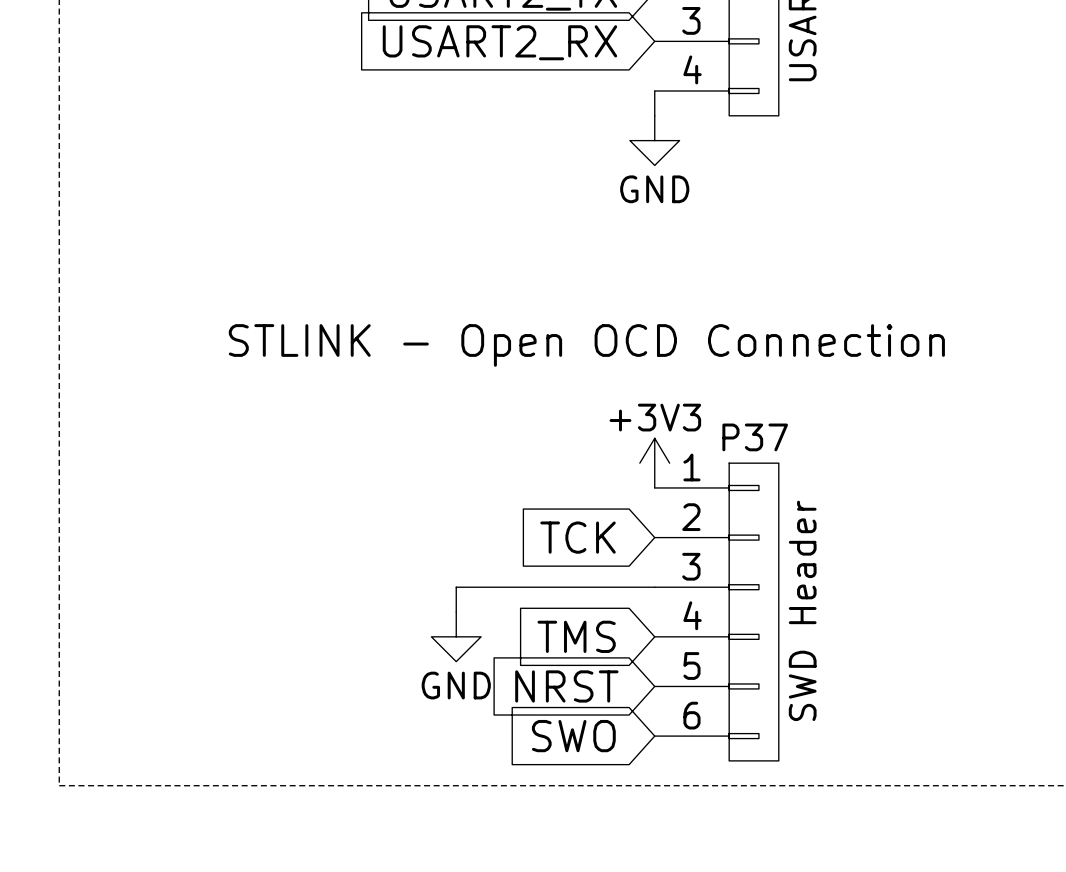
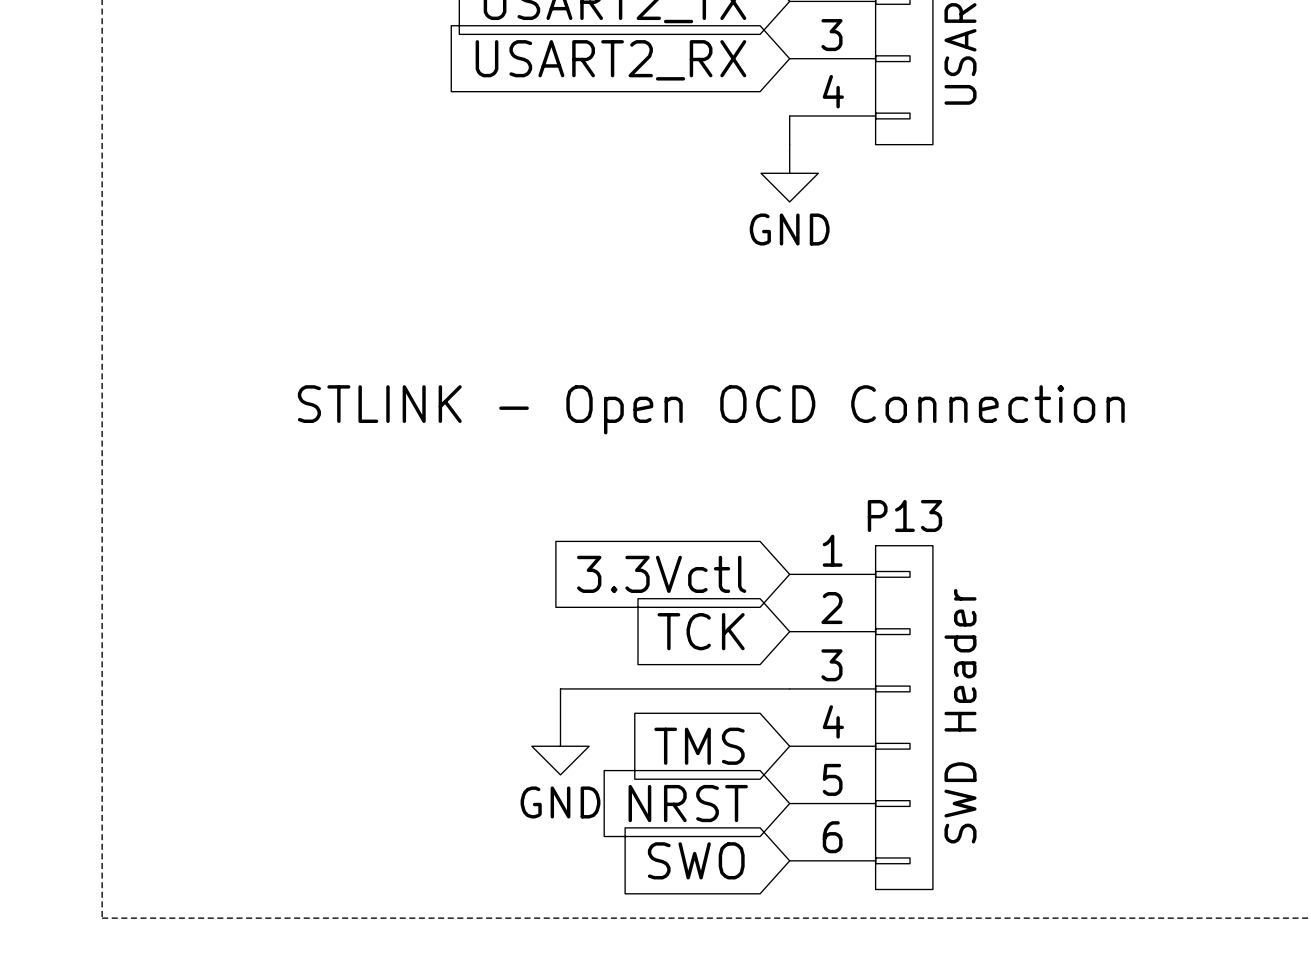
P37 name: P37 (755, 437) -> P13 (904, 516)
power symbol: +3V3 (654, 463) -> none
global label: none -> 3.3Vctl (661, 574)

